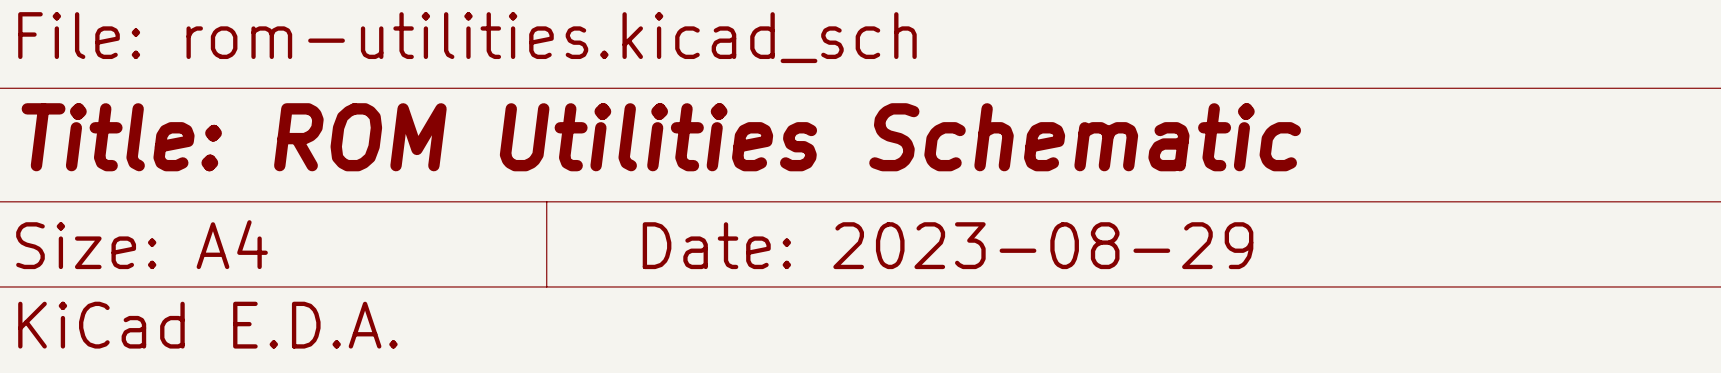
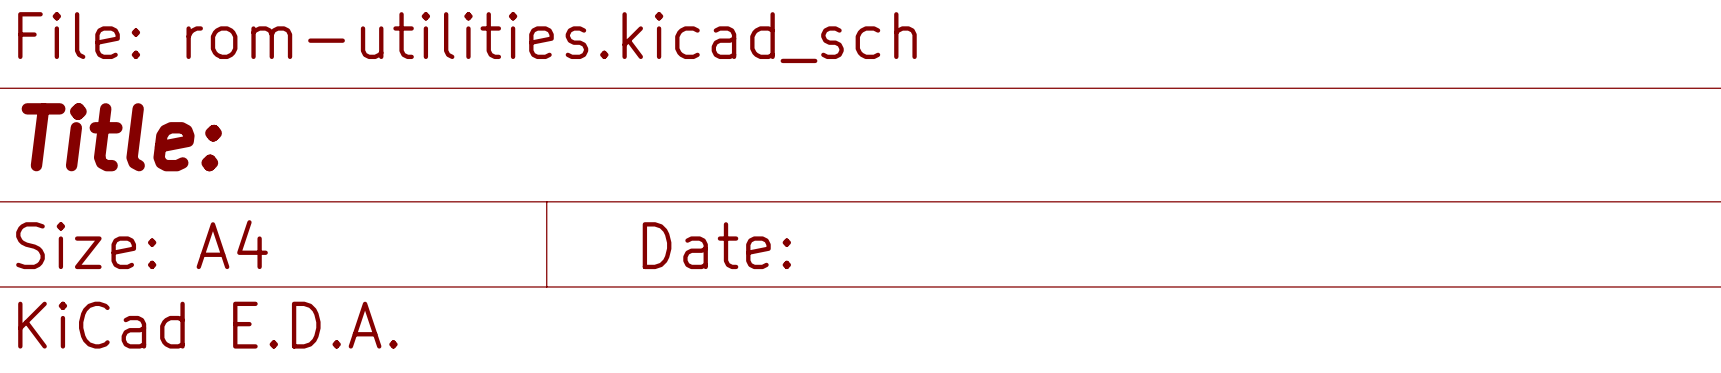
title block: Title: ROM Utilities Schematic (661, 137) -> Title: (121, 137)
title block: Date: 2023-08-29 (948, 245) -> Date: (716, 245)

